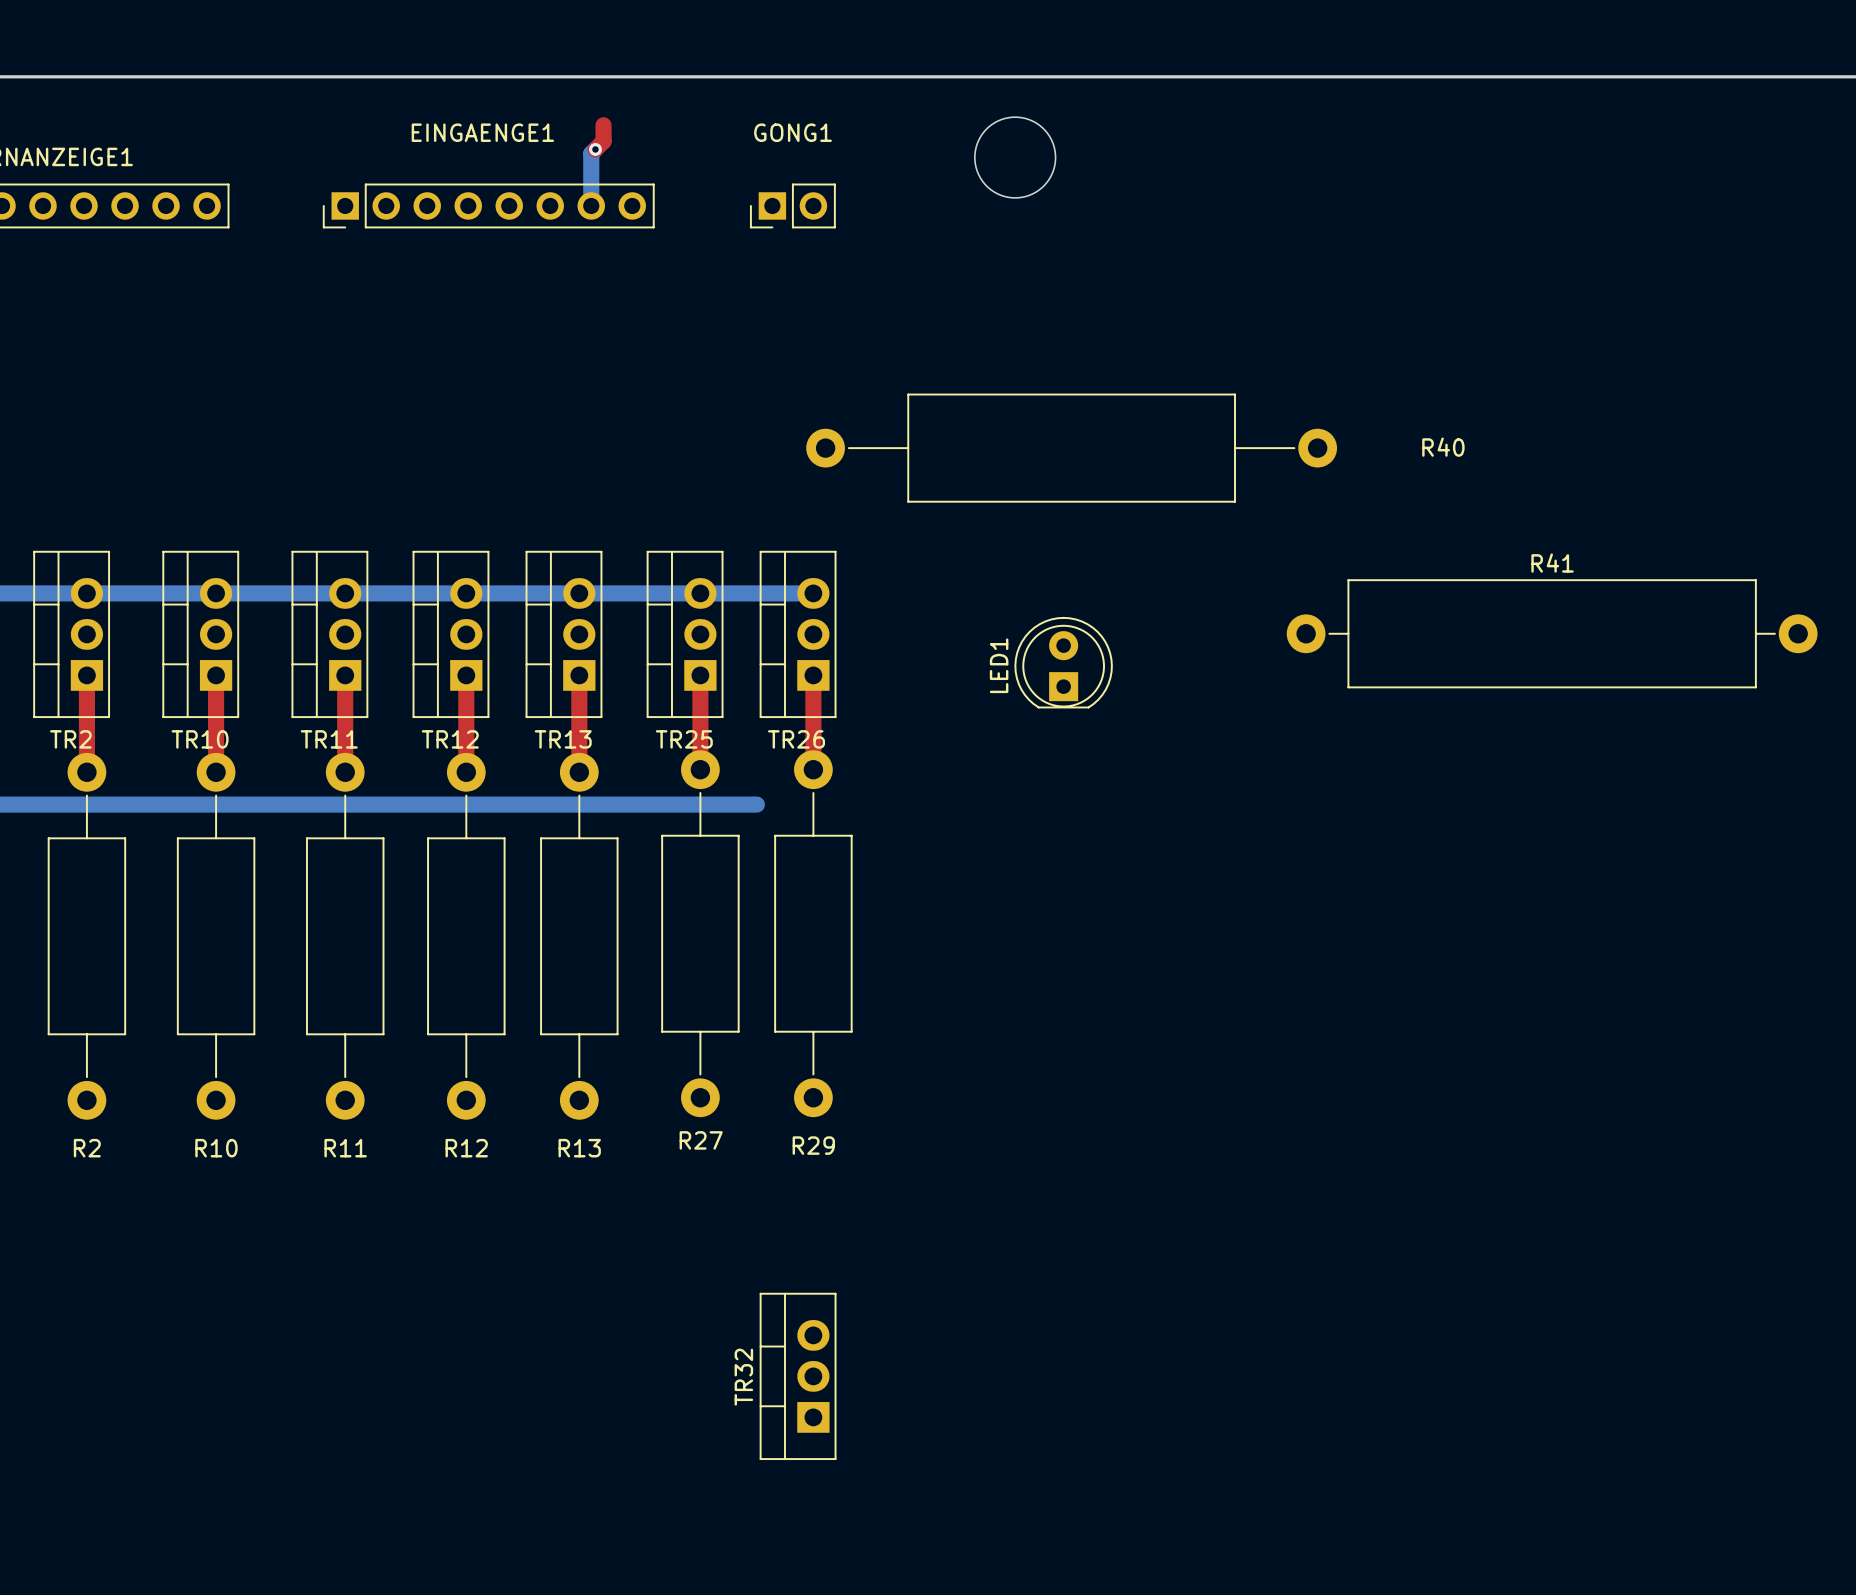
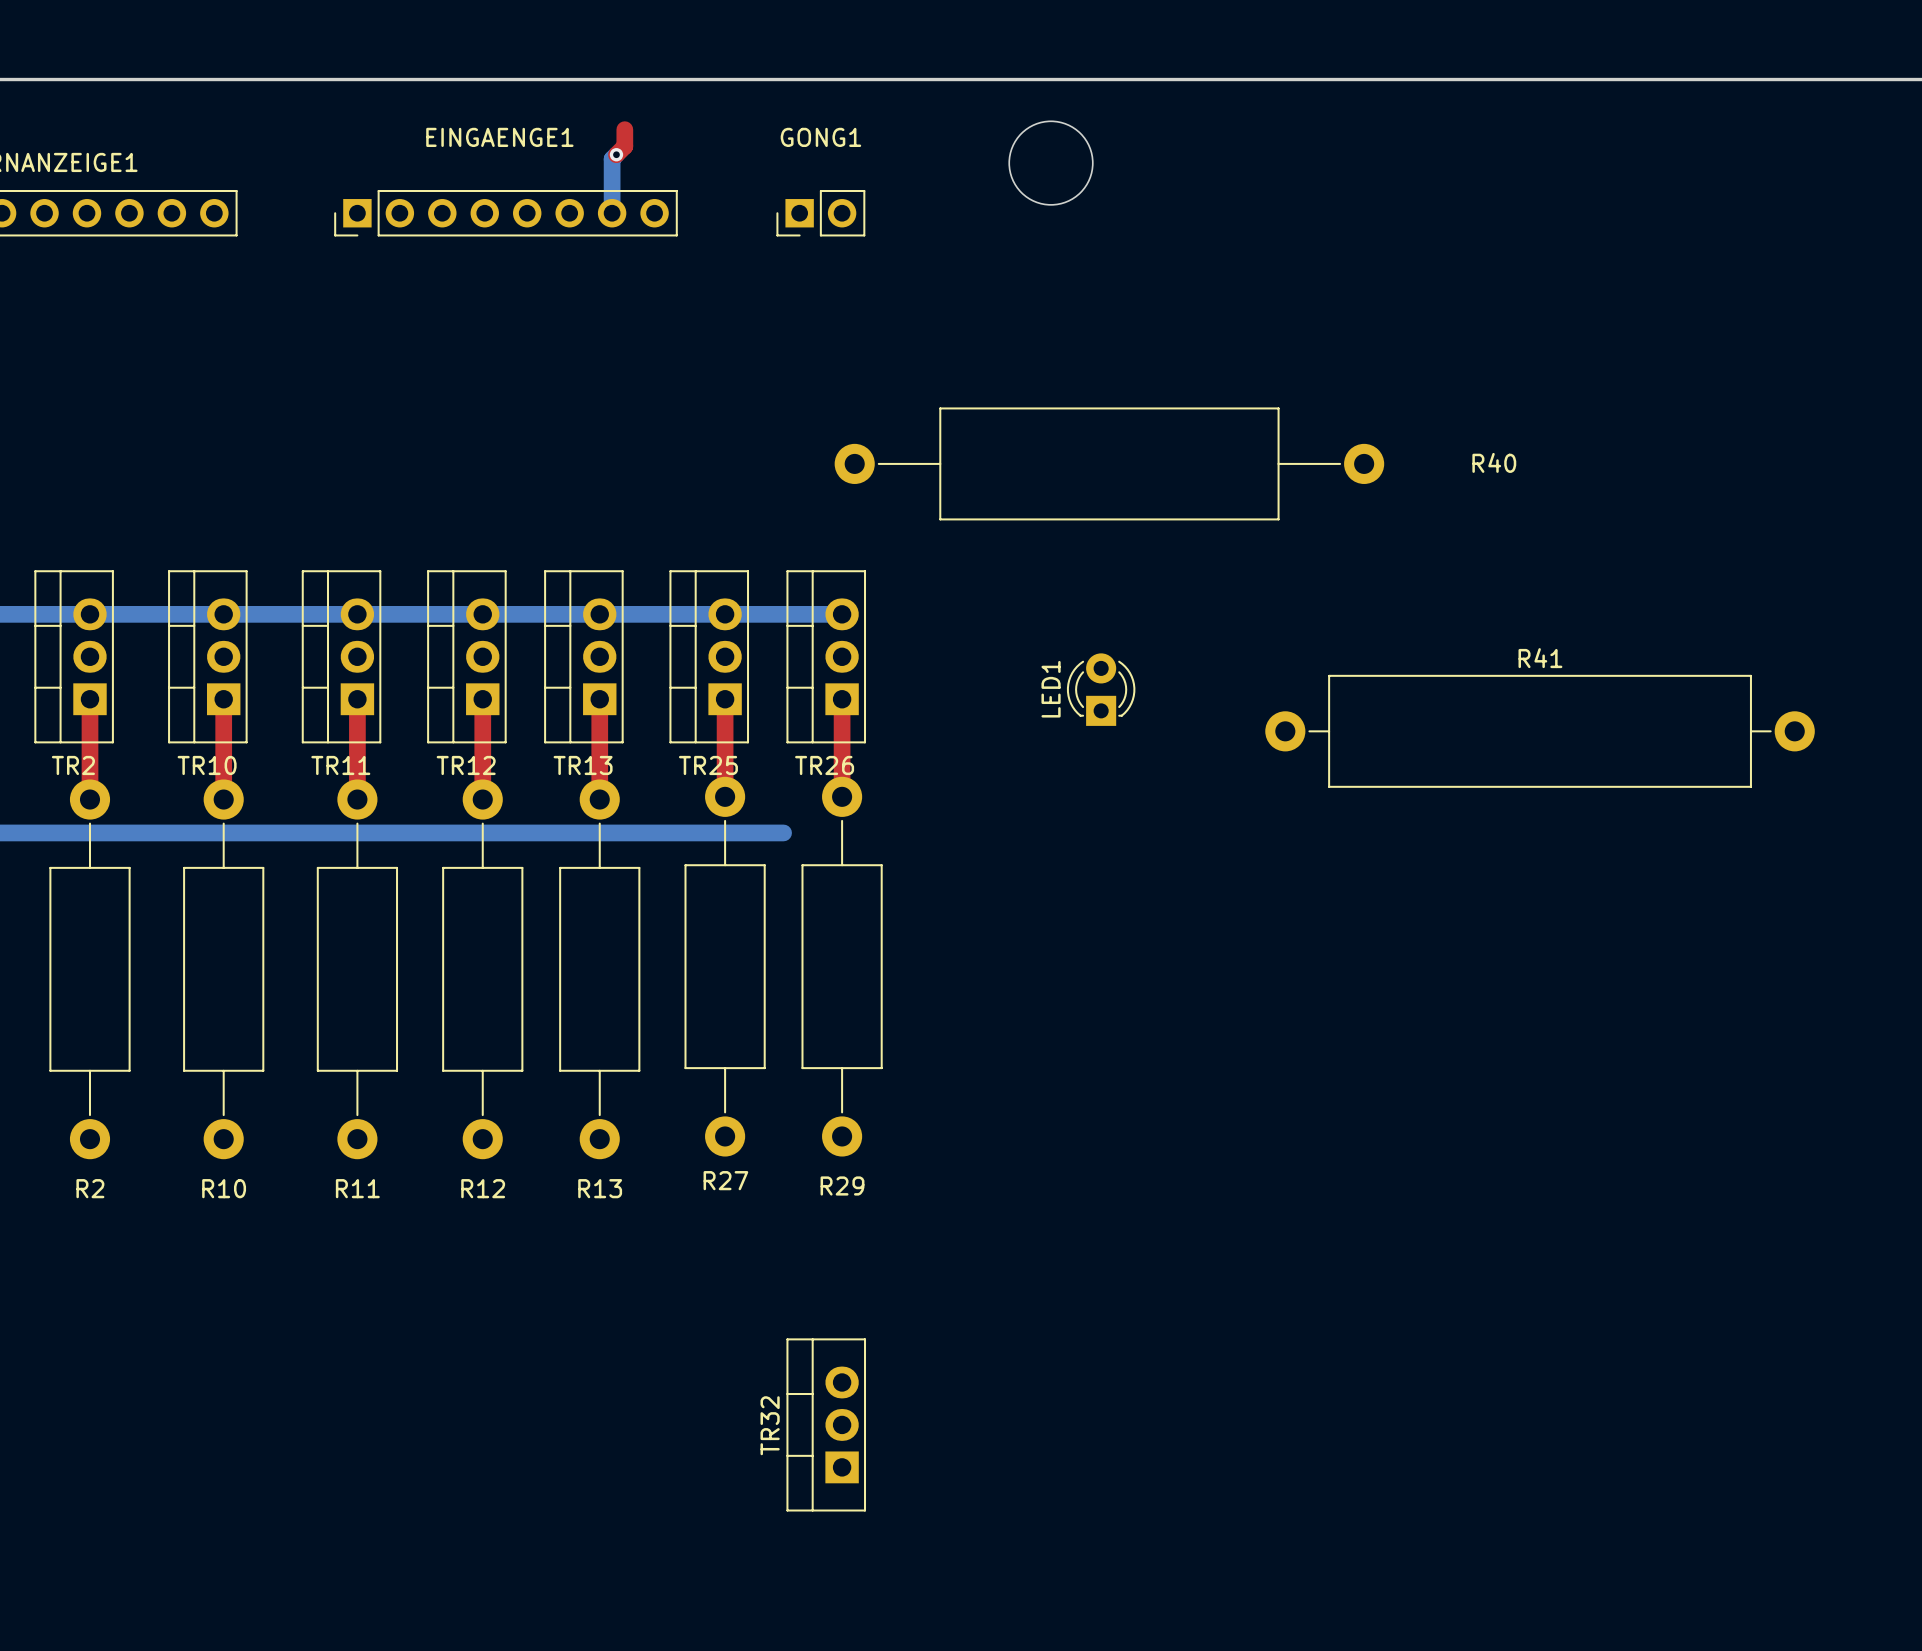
LED1 footprint: [1014, 616, 1113, 709] -> [1066, 653, 1136, 726]
R41 position: (1552, 633) -> (1540, 731)

